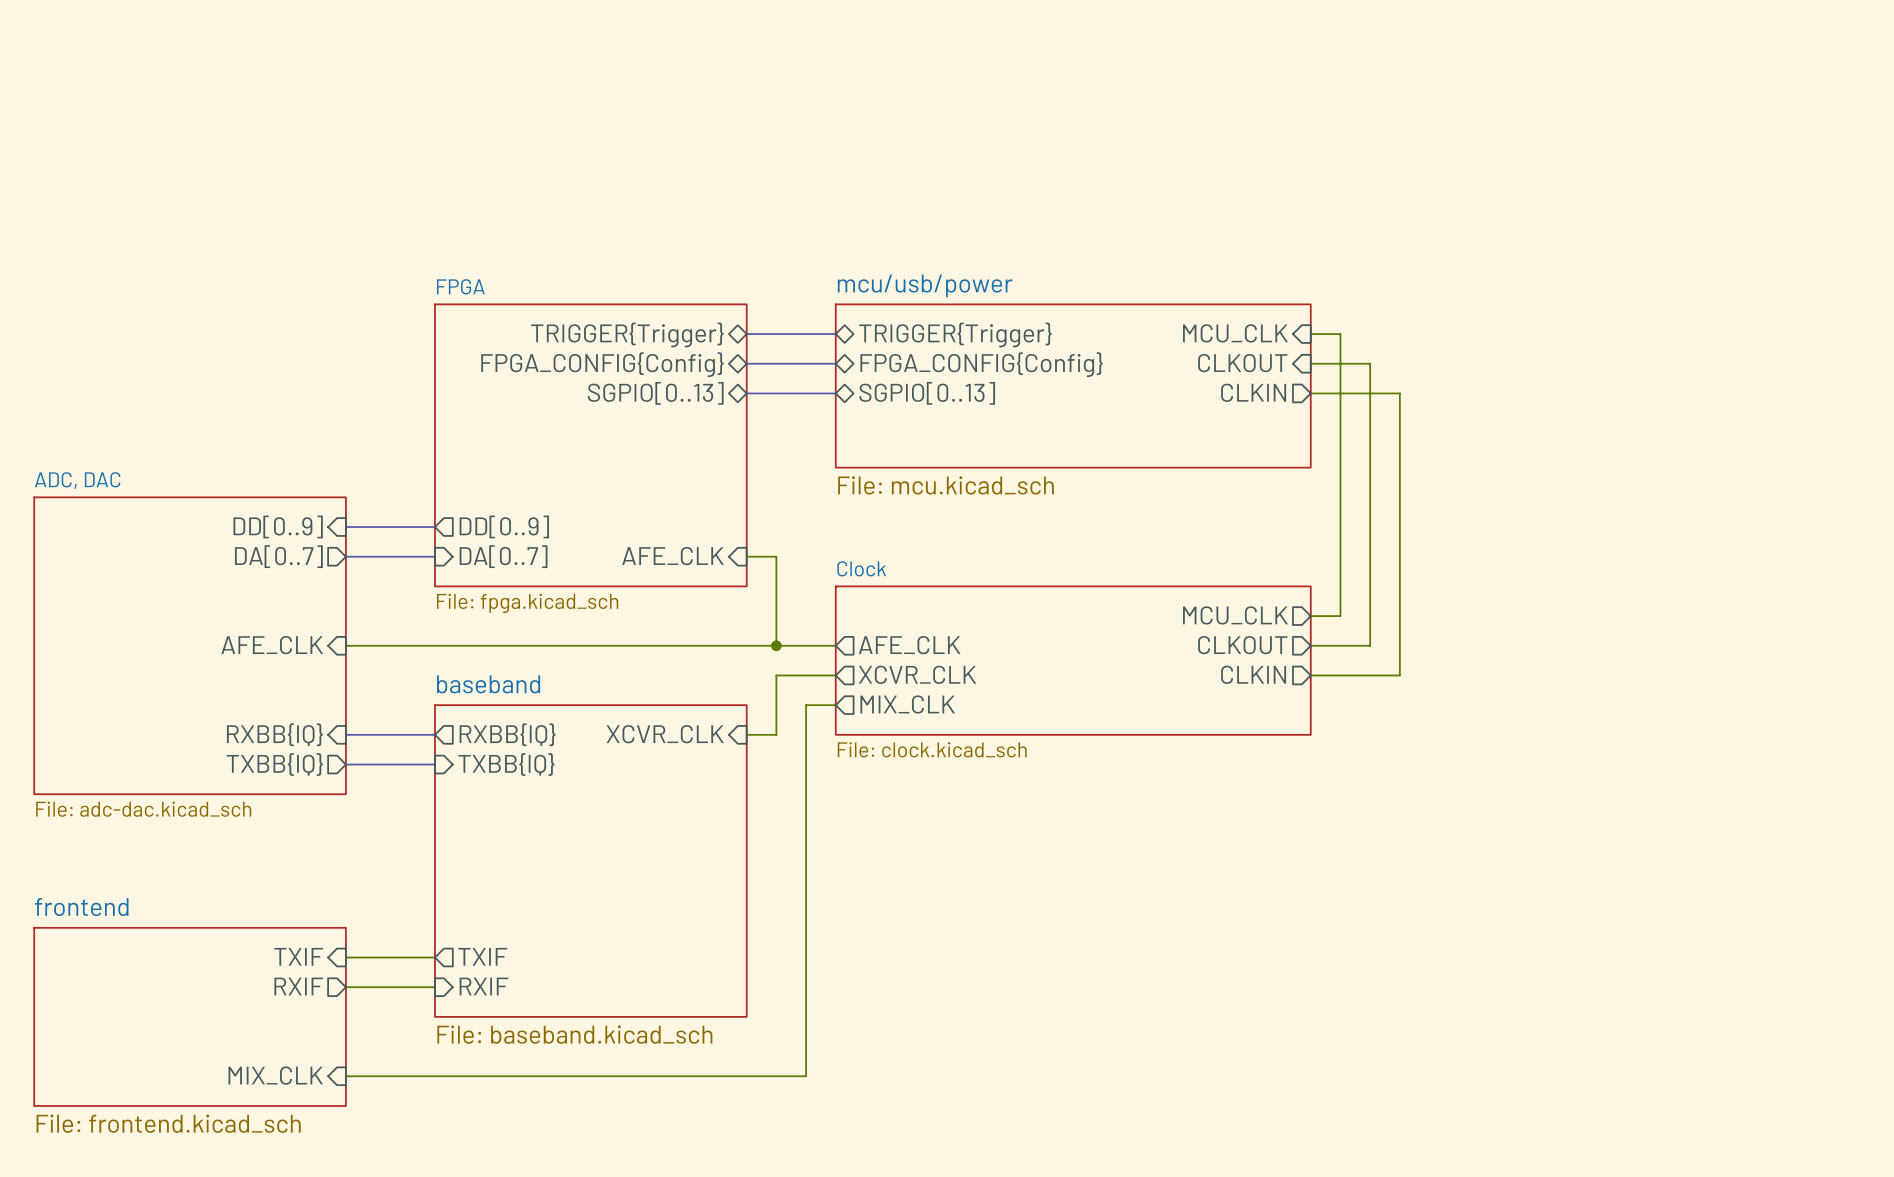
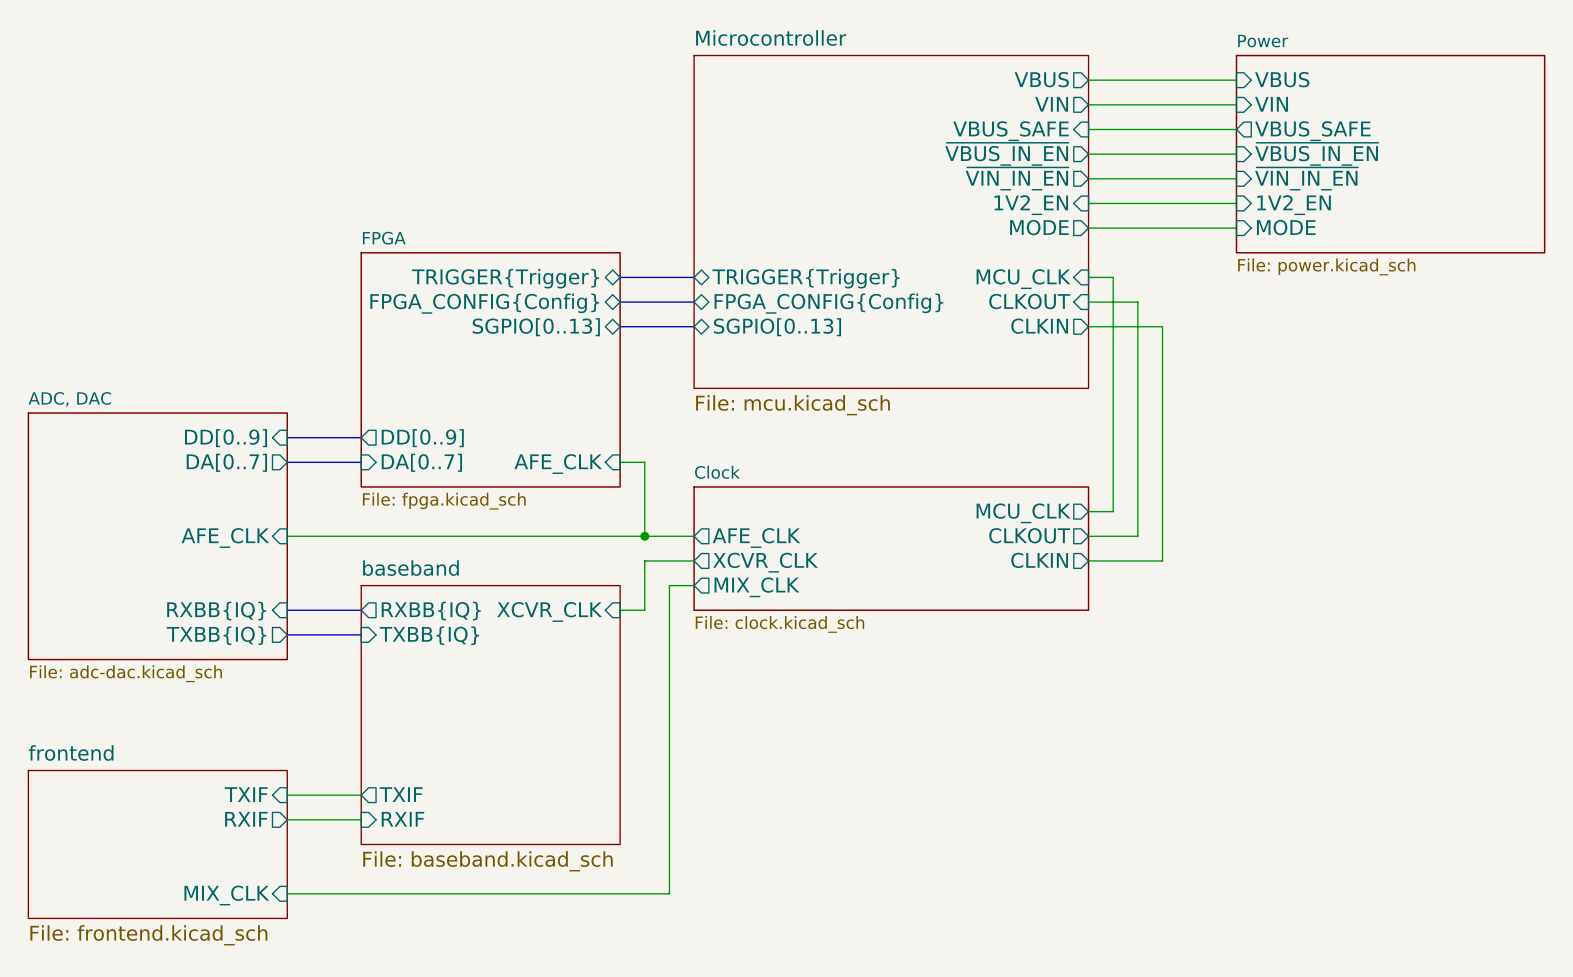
sheet pin: none -> VBUS (1041, 79)
sheet pin: none -> VBUS (1282, 79)
wire: none -> (1088, 80) (1236, 80)
sheet pin: none -> VIN (1051, 104)
sheet pin: none -> VIN (1271, 104)
wire: none -> (1088, 104) (1236, 104)
sheet pin: none -> VBUS_SAFE (1011, 131)
wire: none -> (1088, 129) (1236, 129)
sheet pin: none -> VBUS_SAFE (1312, 131)
sheet pin: none -> ~{VBUS_IN_EN} (1006, 154)
sheet pin: none -> ~{VBUS_IN_EN} (1316, 154)
wire: none -> (1088, 154) (1236, 154)
sheet Power: none -> File: power.kicad_sch (1390, 154)
sheet pin: none -> ~{VIN_IN_EN} (1017, 178)
sheet pin: none -> ~{VIN_IN_EN} (1306, 178)
wire: none -> (1088, 178) (1236, 178)
sheet pin: none -> 1V2_EN (1031, 205)
wire: none -> (1088, 203) (1236, 203)
sheet pin: none -> 1V2_EN (1294, 205)
sheet Microcontroller: none -> File: mcu.kicad_sch (891, 221)
sheet pin: none -> MODE (1039, 227)
wire: none -> (1088, 228) (1236, 228)
sheet pin: none -> MODE (1286, 227)
sheet mcu/usb/power: File: mcu.kicad_sch (1073, 386) -> none

